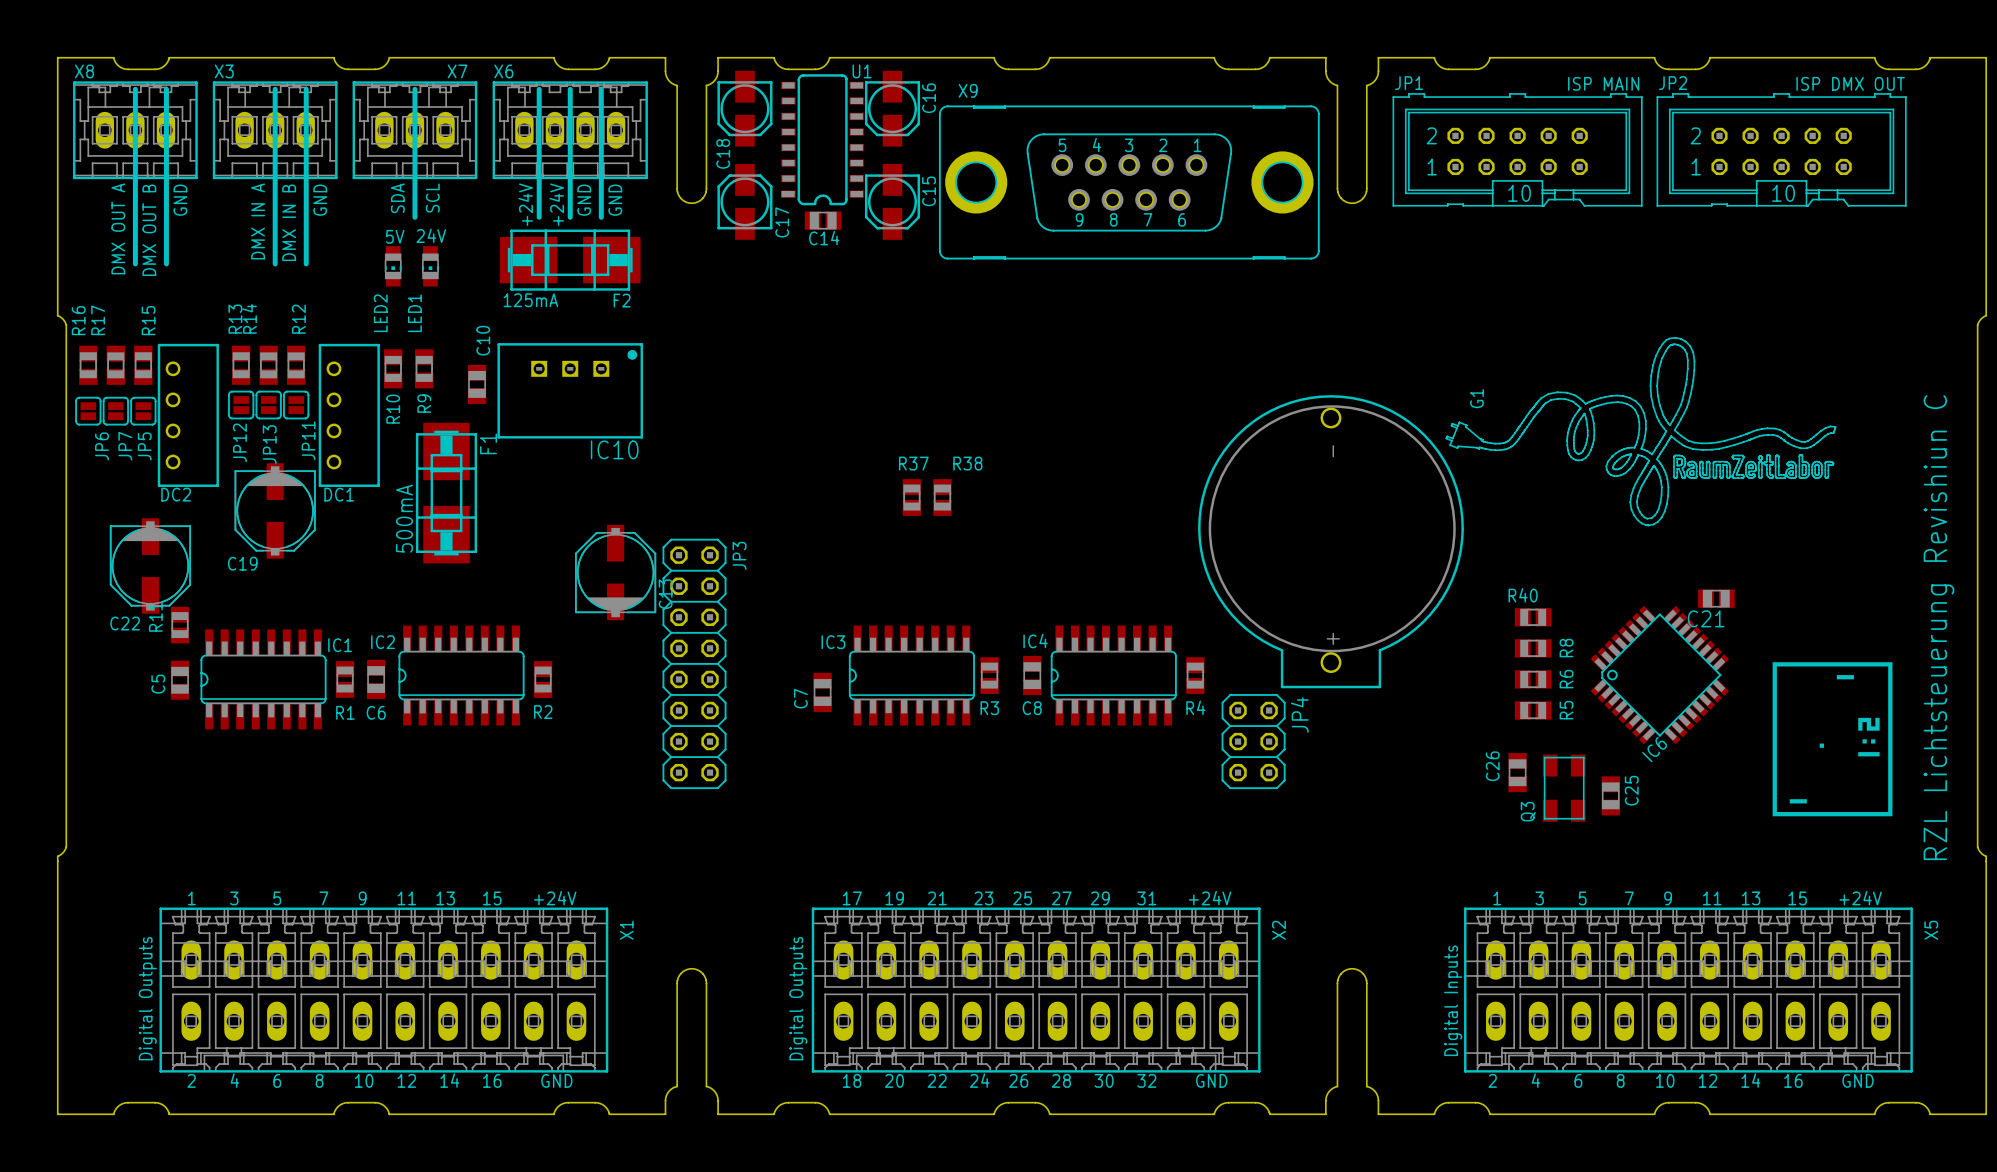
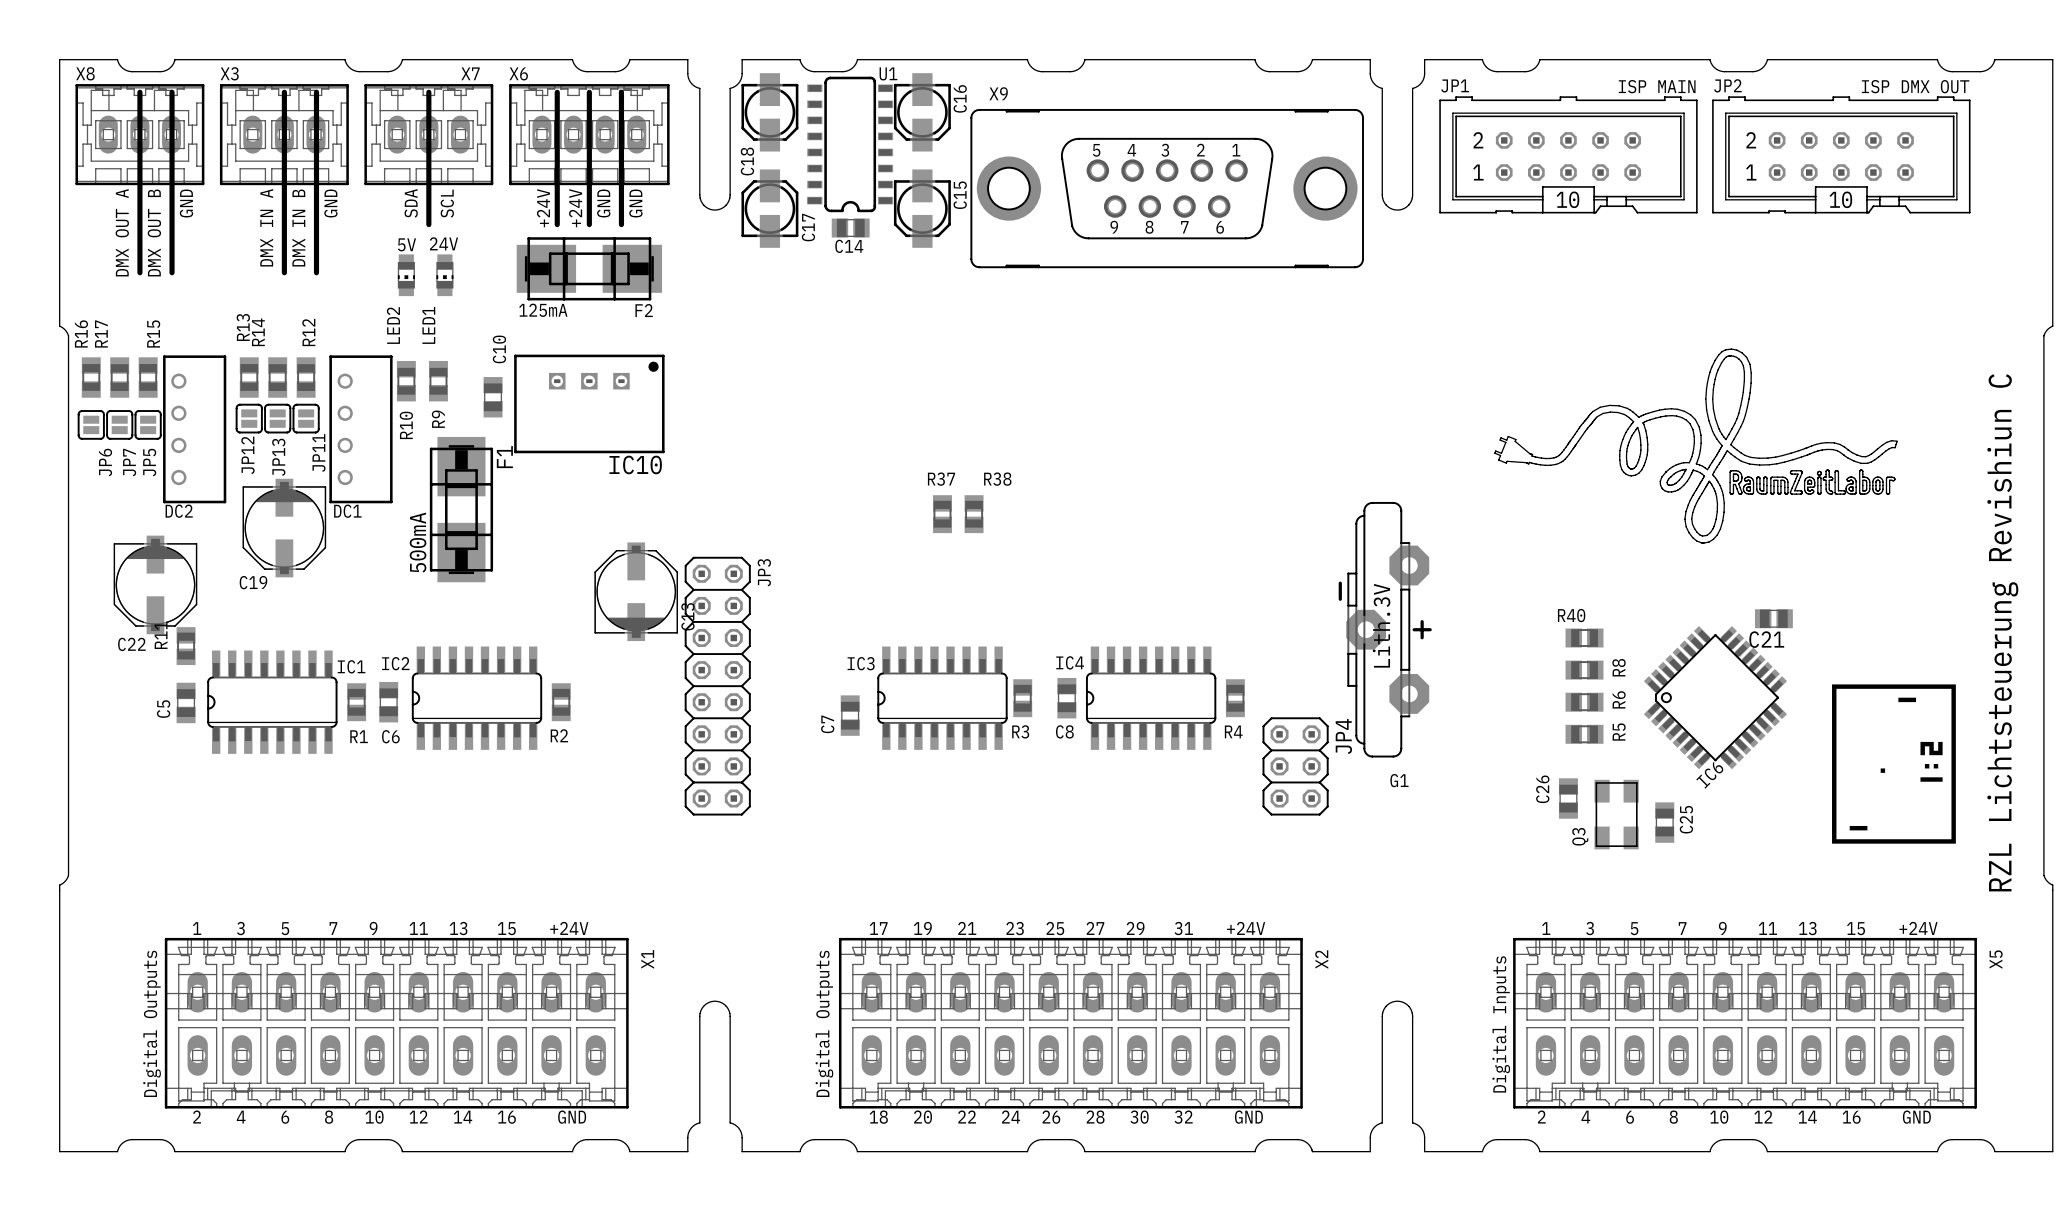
G1 footprint: [1198, 395, 1464, 689] -> [1338, 501, 1432, 758]
G1 name position: G1 (1476, 398) -> G1 (1399, 780)

